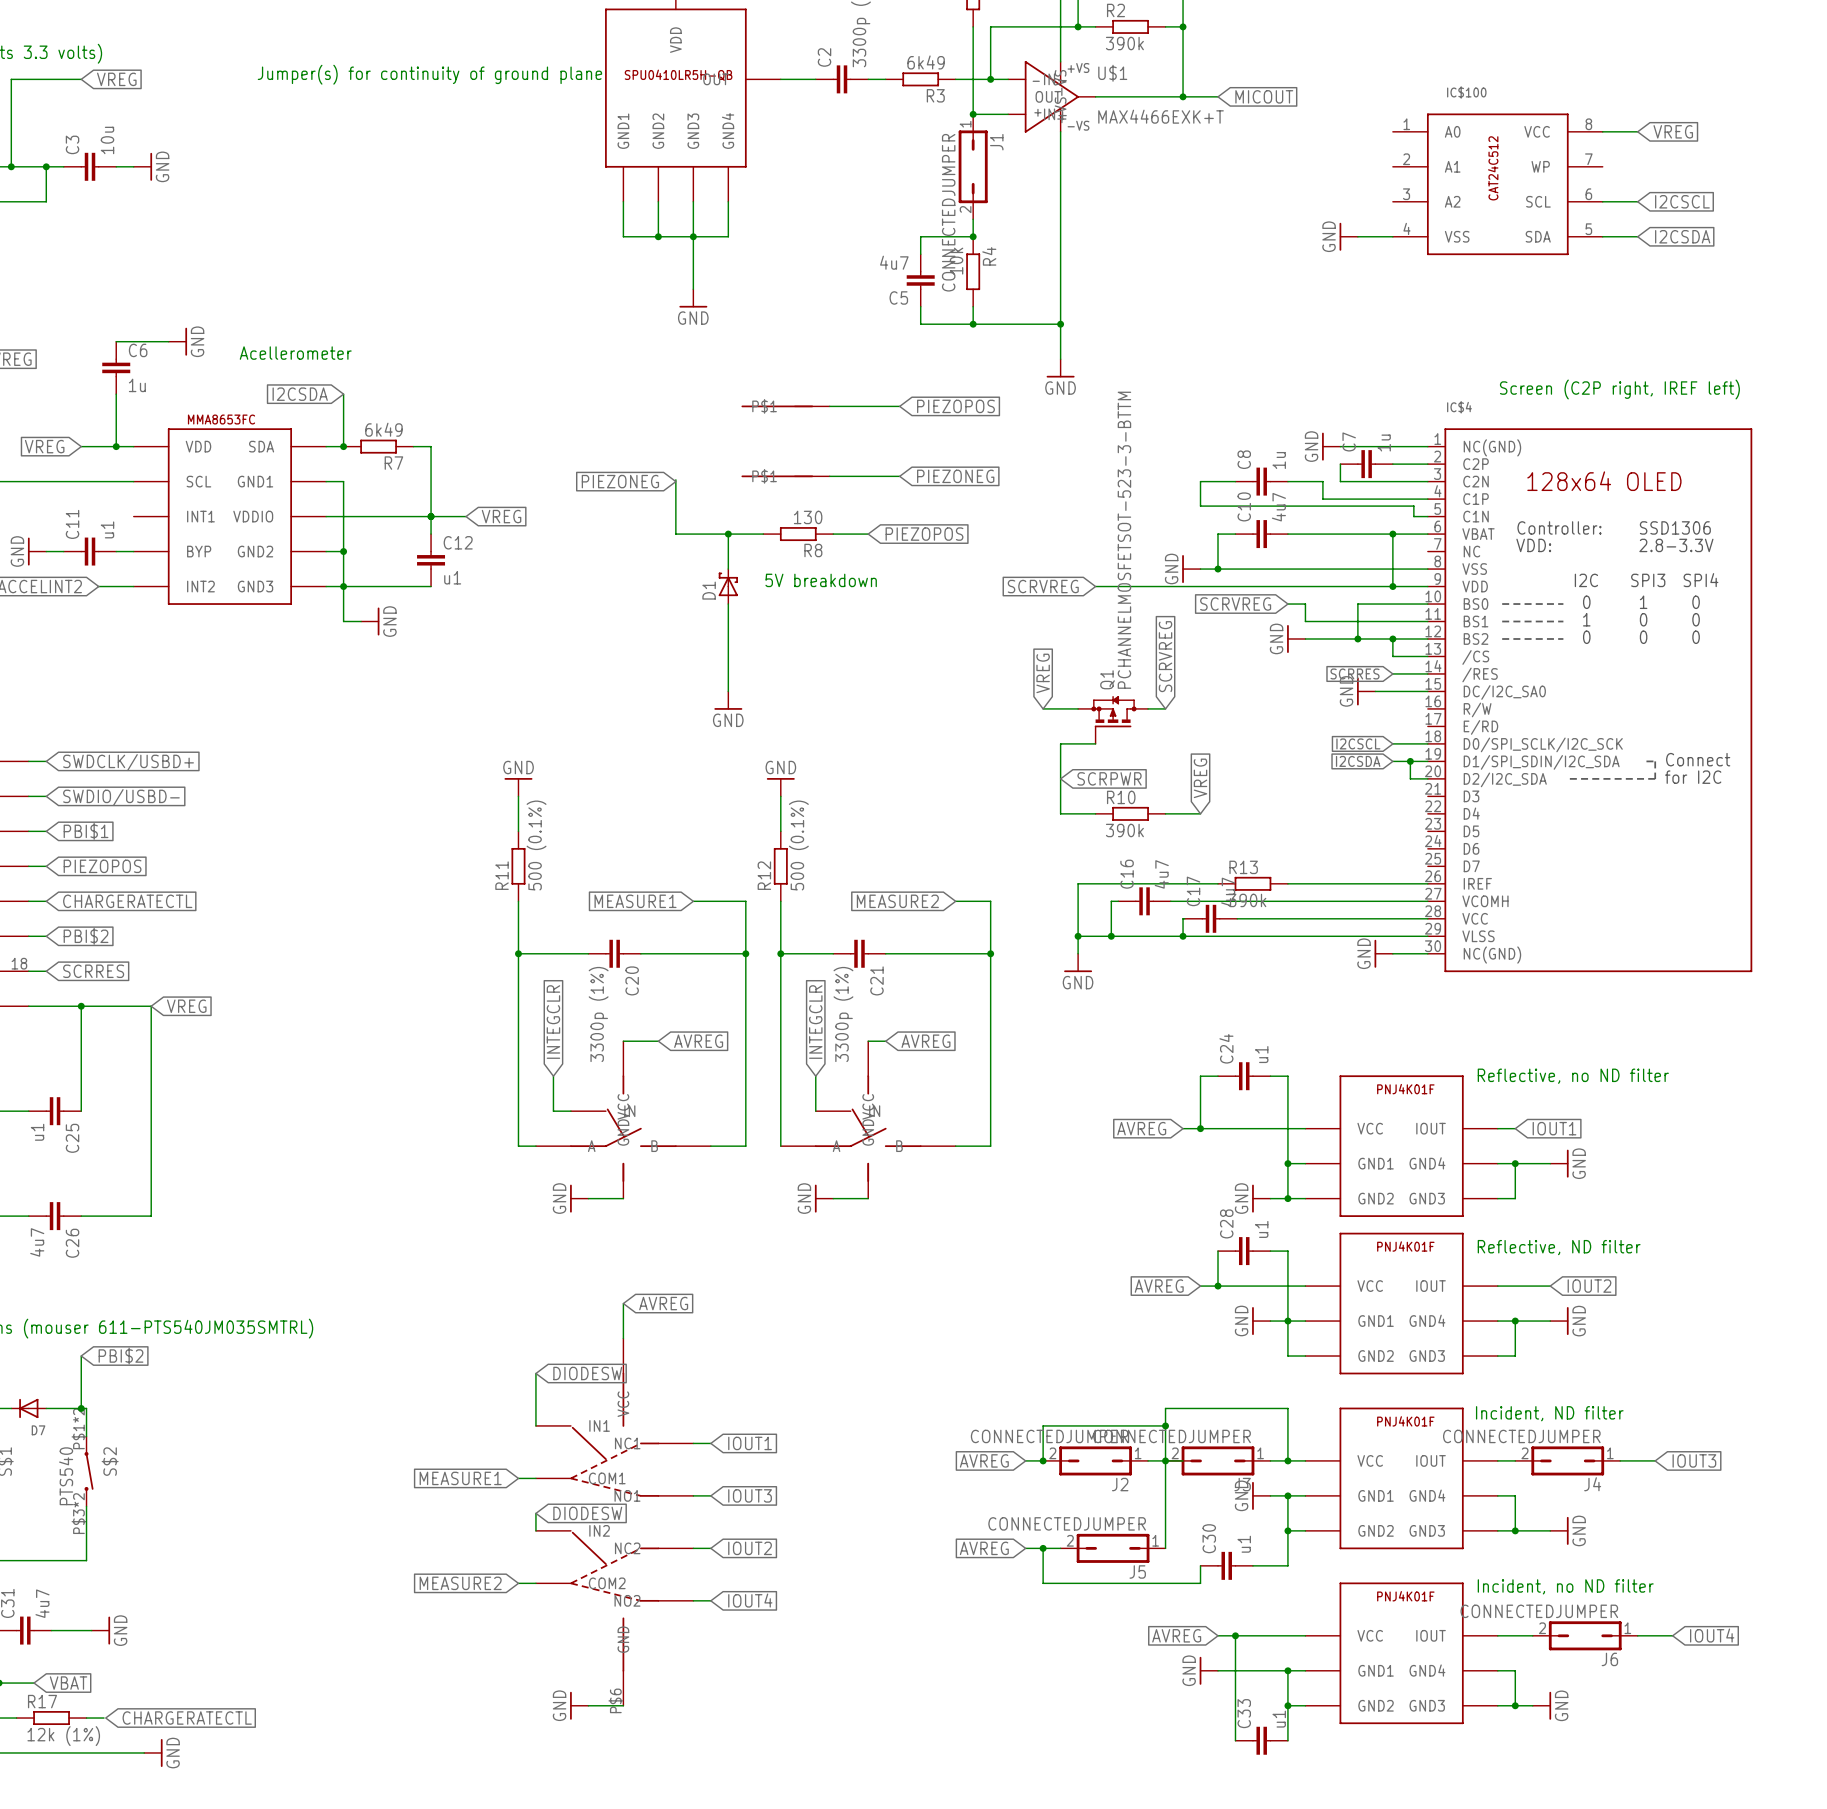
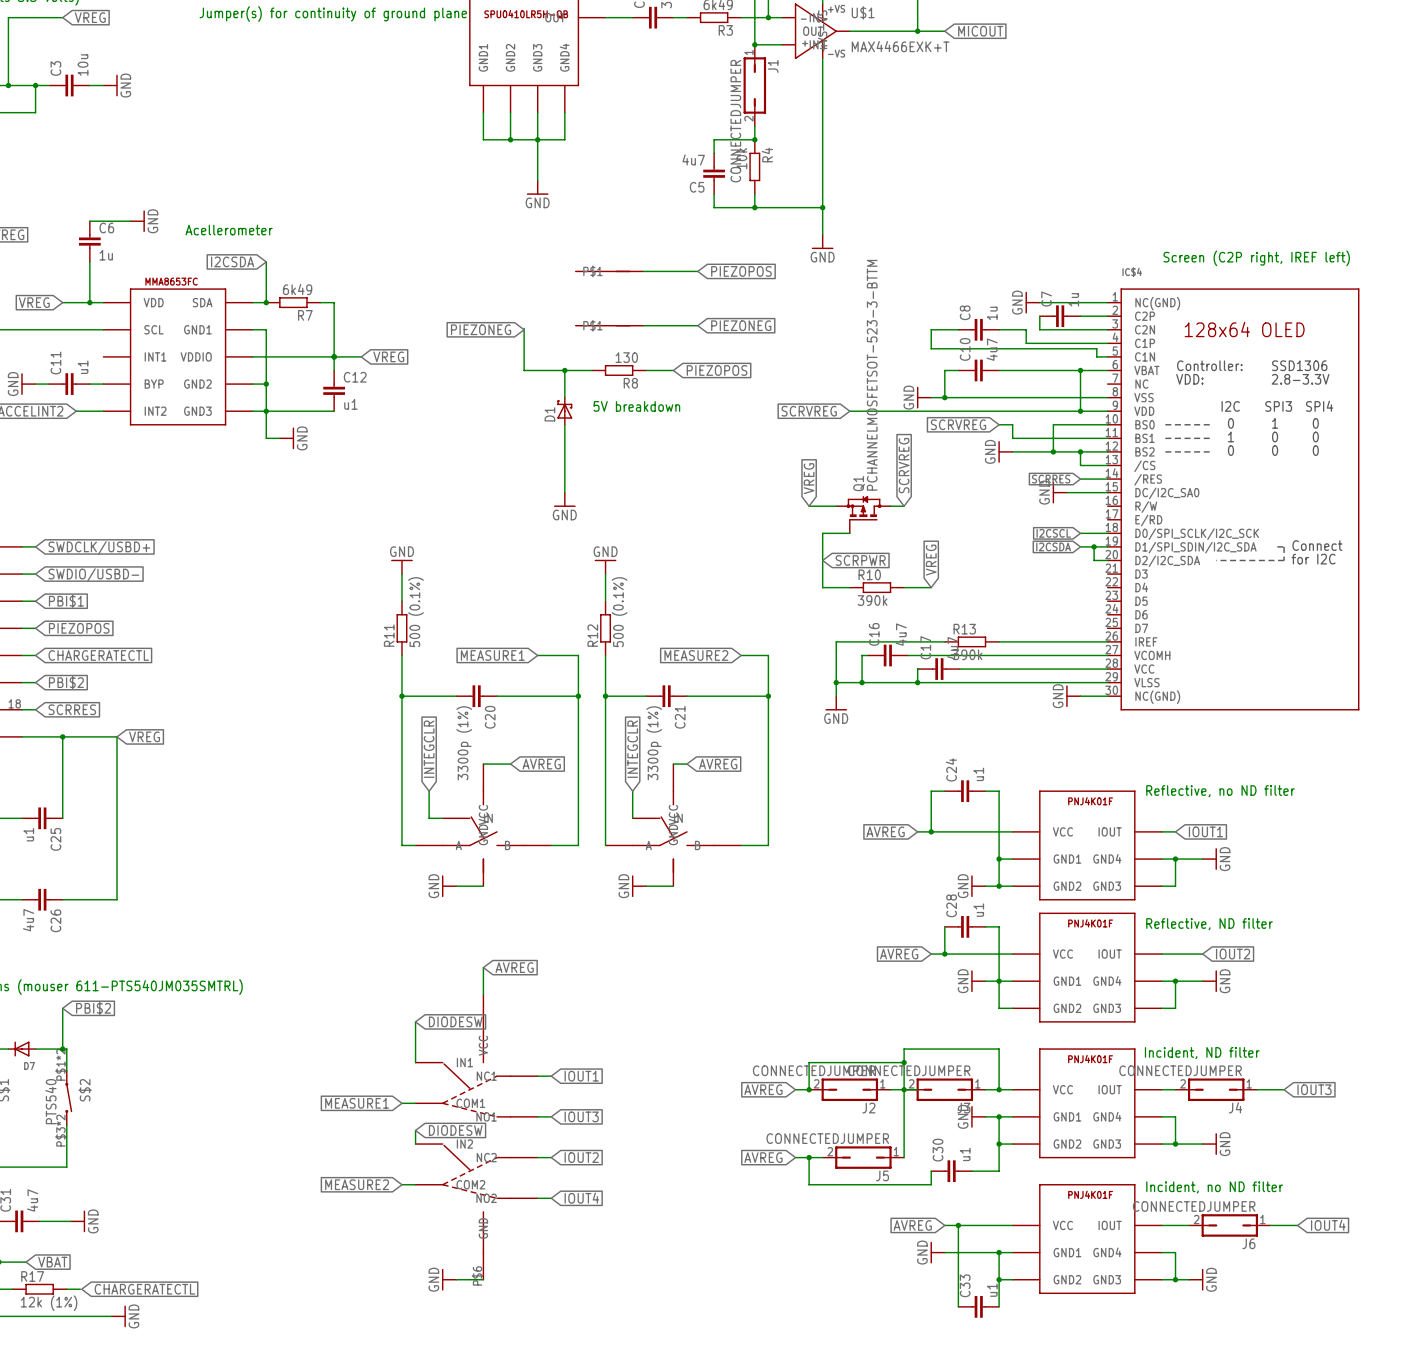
wire: (1602, 131) (1637, 131) -> none
global label: VREG (1673, 131) -> none
IC$100: (1497, 184) -> none
wire: (1602, 201) (1637, 201) -> none
global label: I2CSCL (1682, 201) -> none
power symbol: GND (1348, 236) -> none
wire: (1357, 236) (1392, 236) -> none
wire: (1602, 236) (1637, 236) -> none
global label: I2CSDA (1682, 236) -> none

